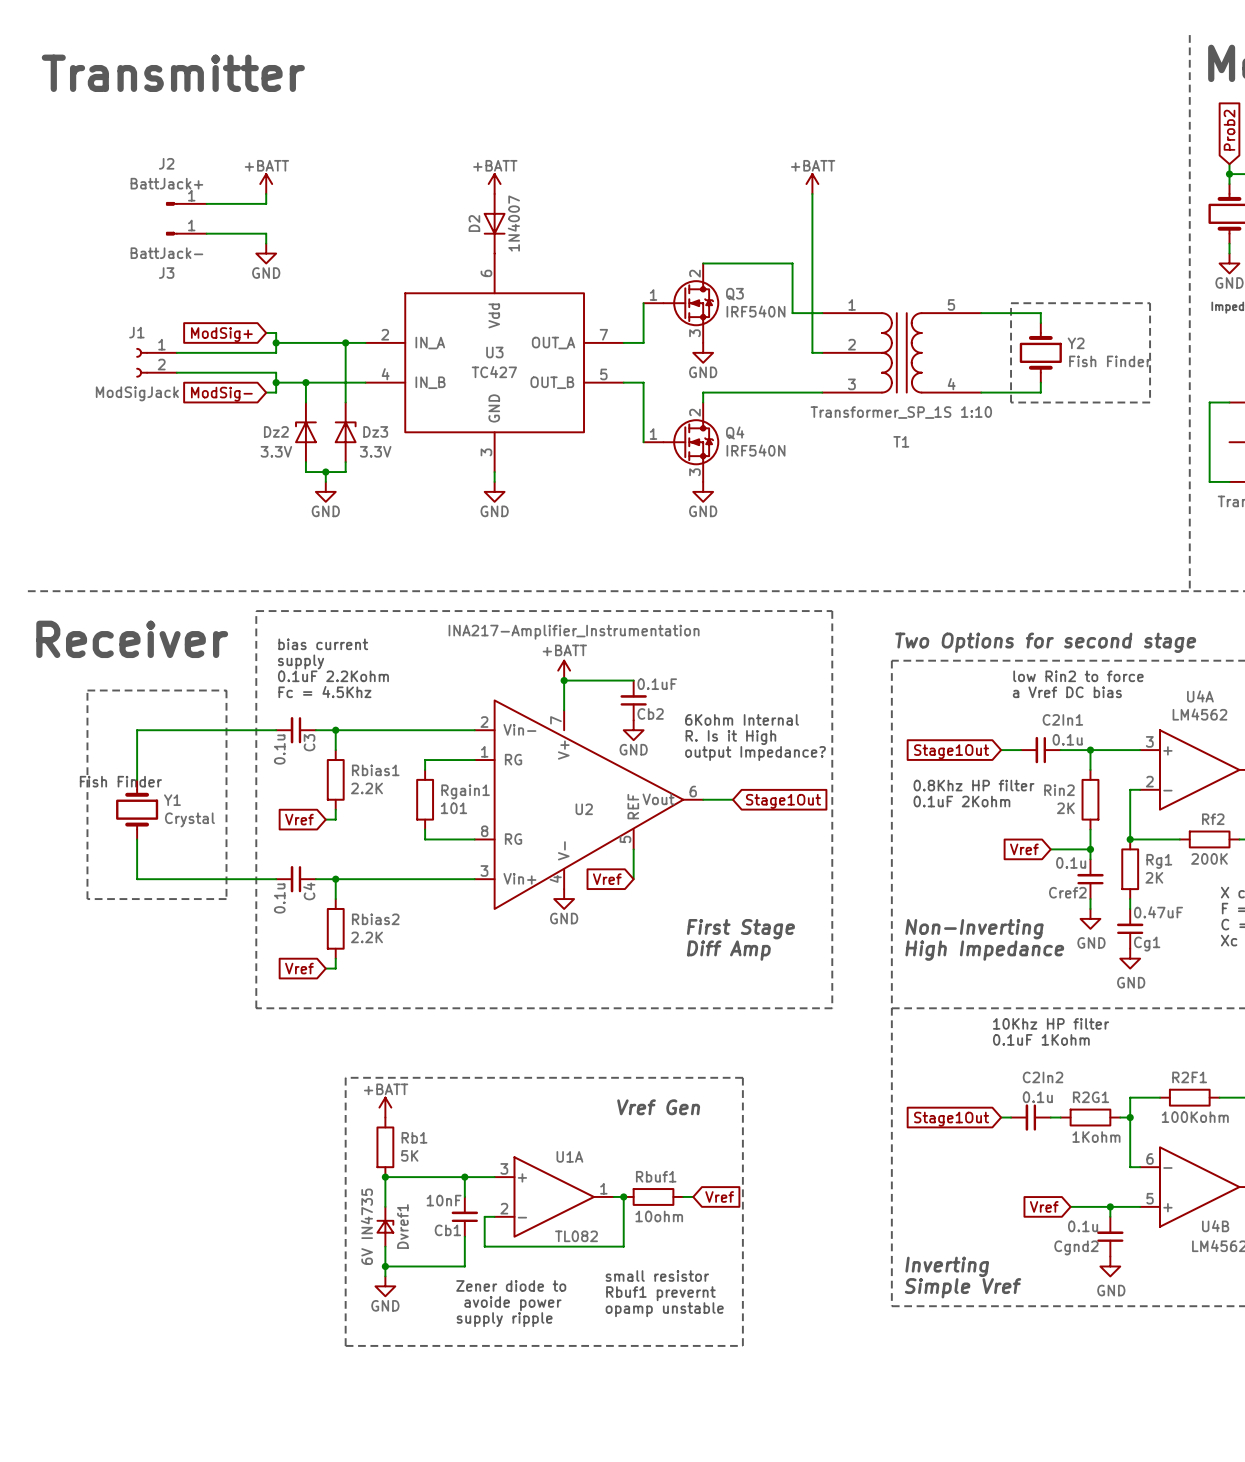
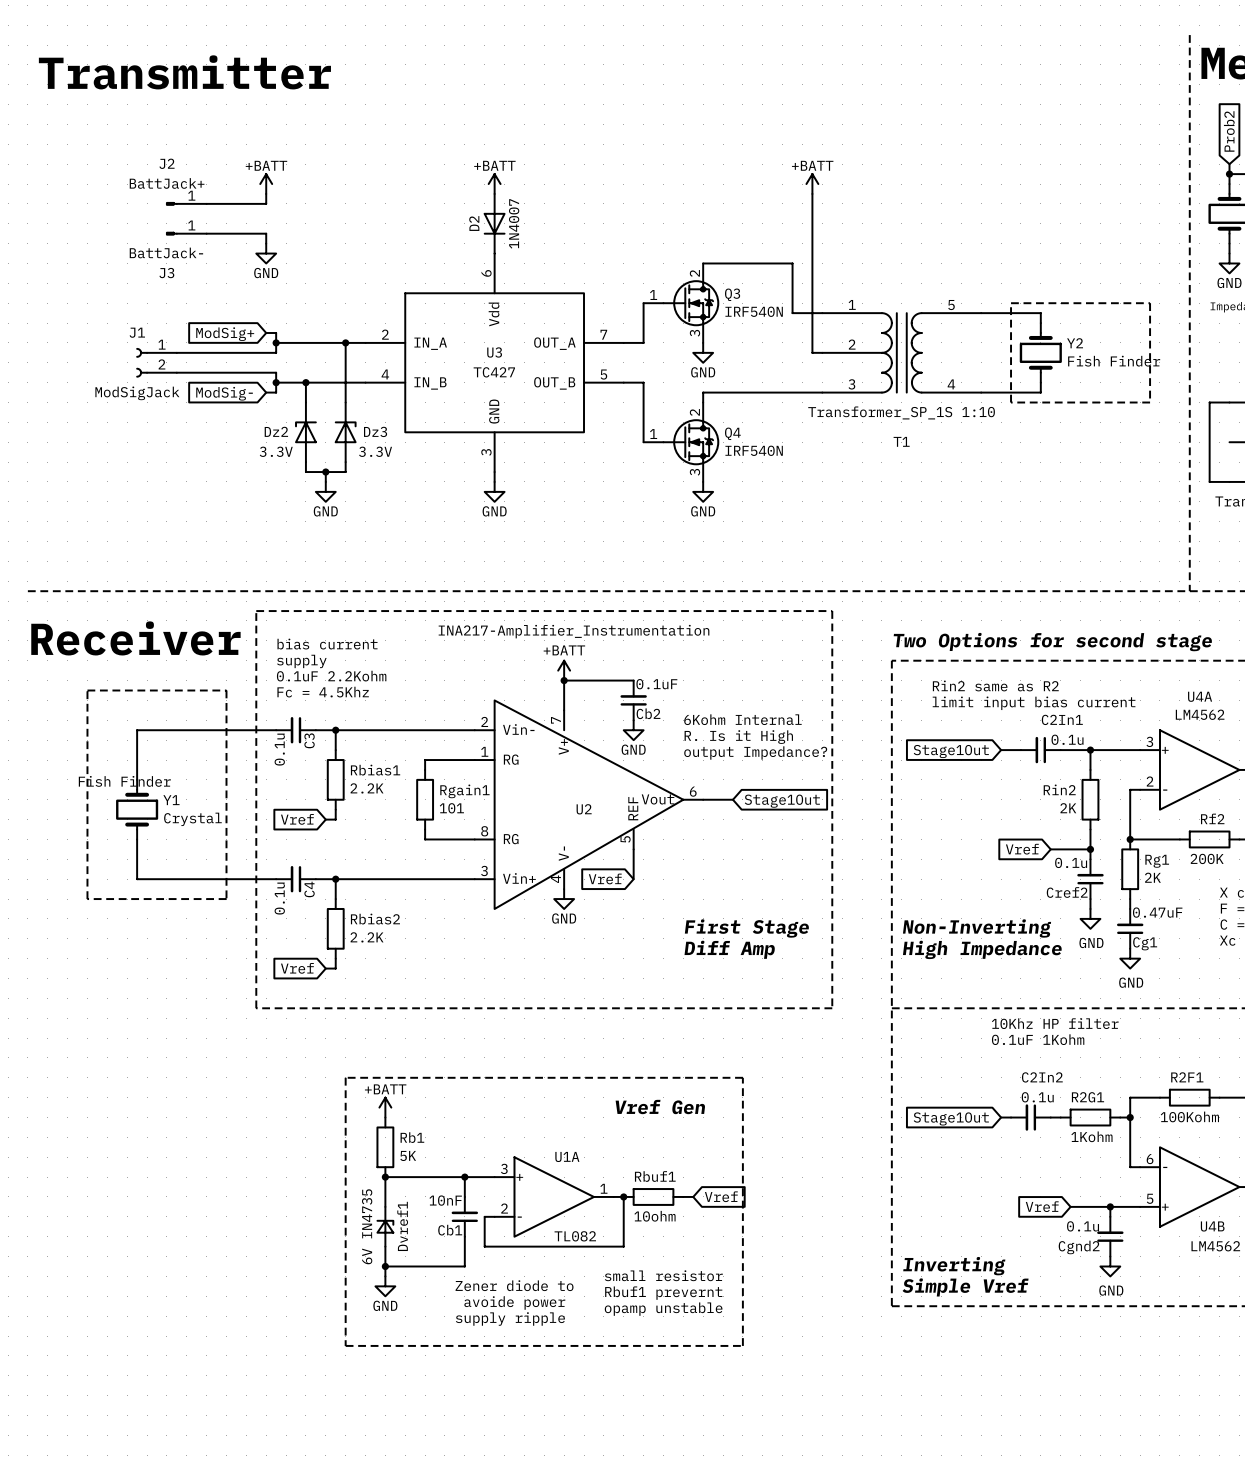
text: low Rin2 to force (1078, 676) -> none
text: none -> Rin2 same as R2 (995, 685)
text: a Vref DC bias (1067, 692) -> none
text: none -> limit input bias current (1034, 703)
text: 0.8Khz HP filter (973, 785) -> none
text: 0.1uF 2Kohm (961, 801) -> none

